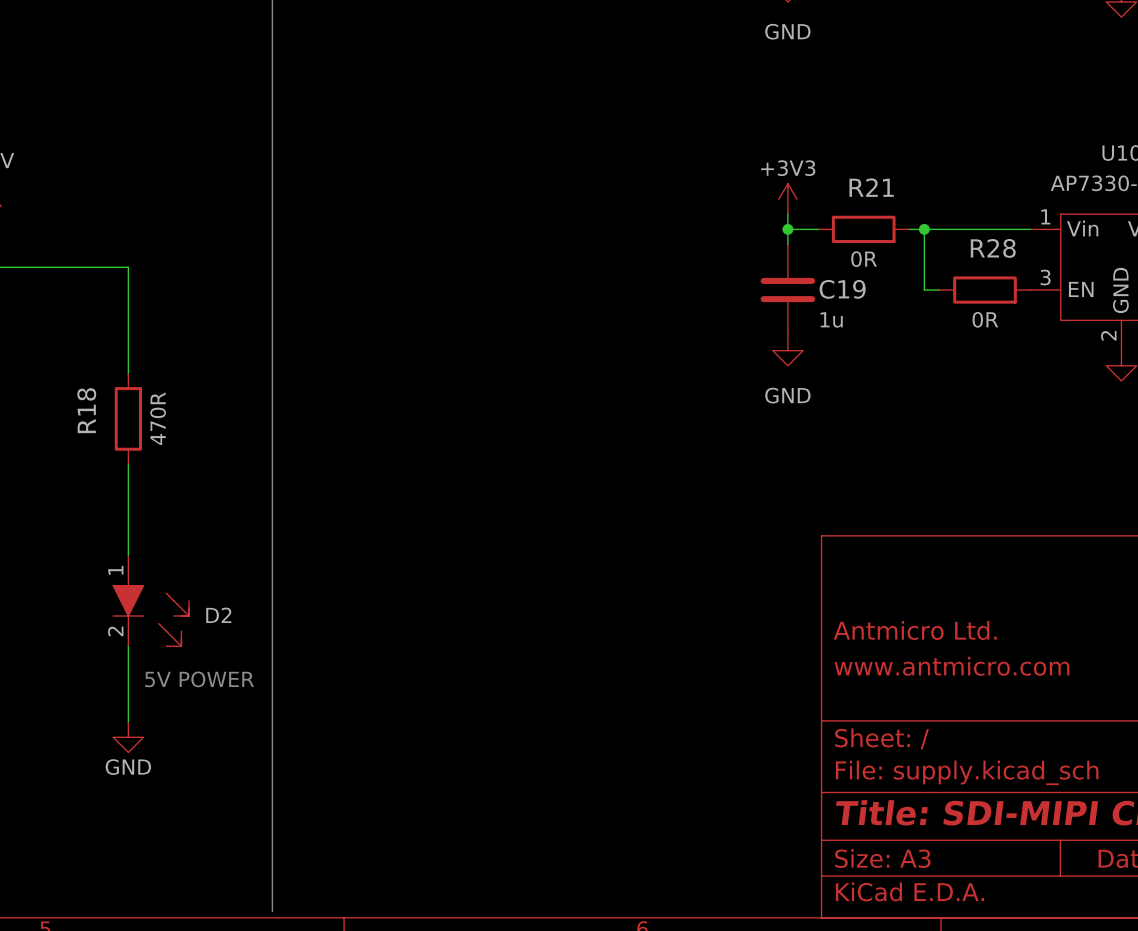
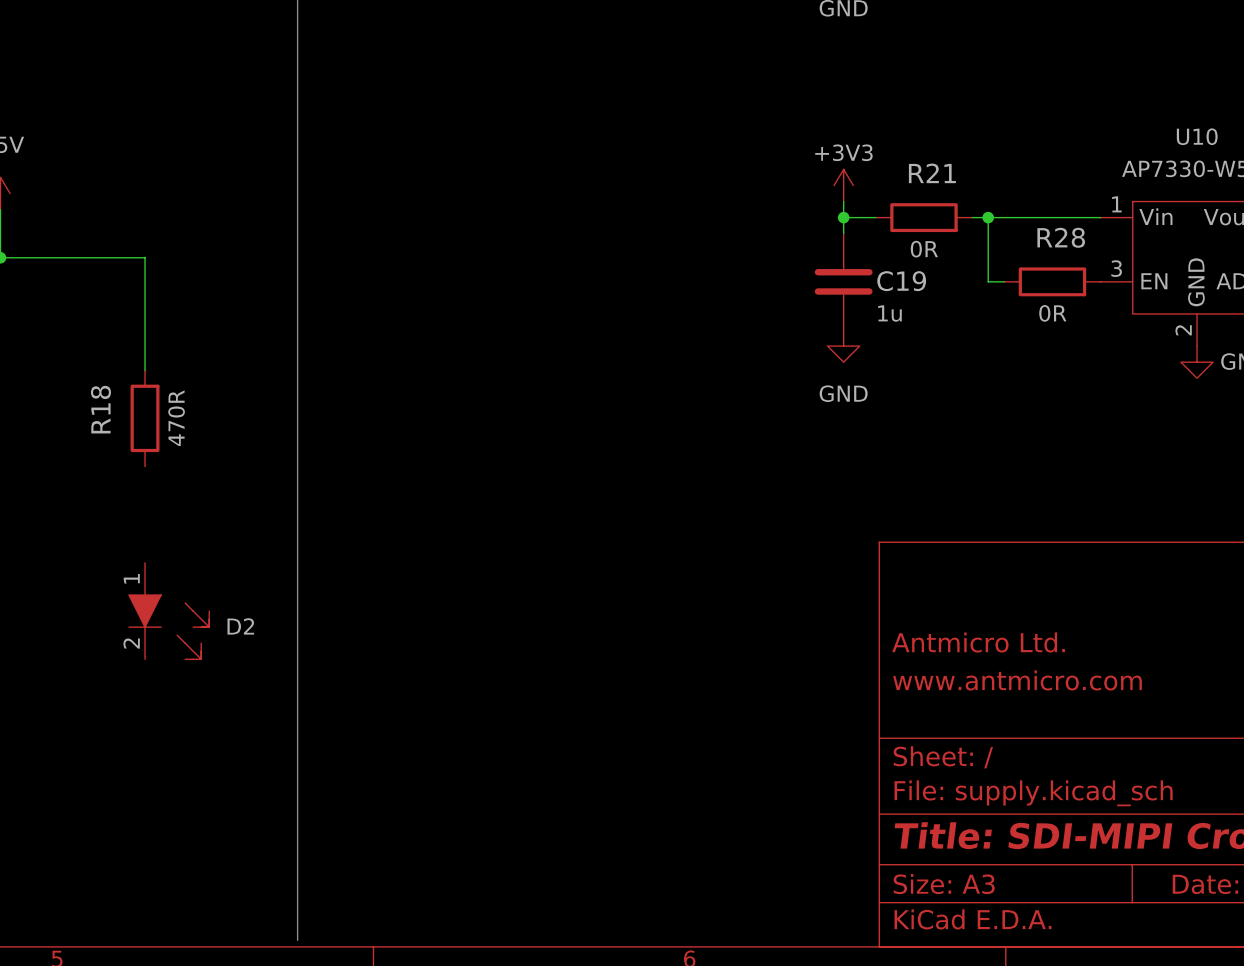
wire: (128, 464) (128, 555) -> none
wire: (128, 646) (128, 722) -> none
text: 5V POWER (199, 679) -> none
power symbol: GND (128, 737) -> none

